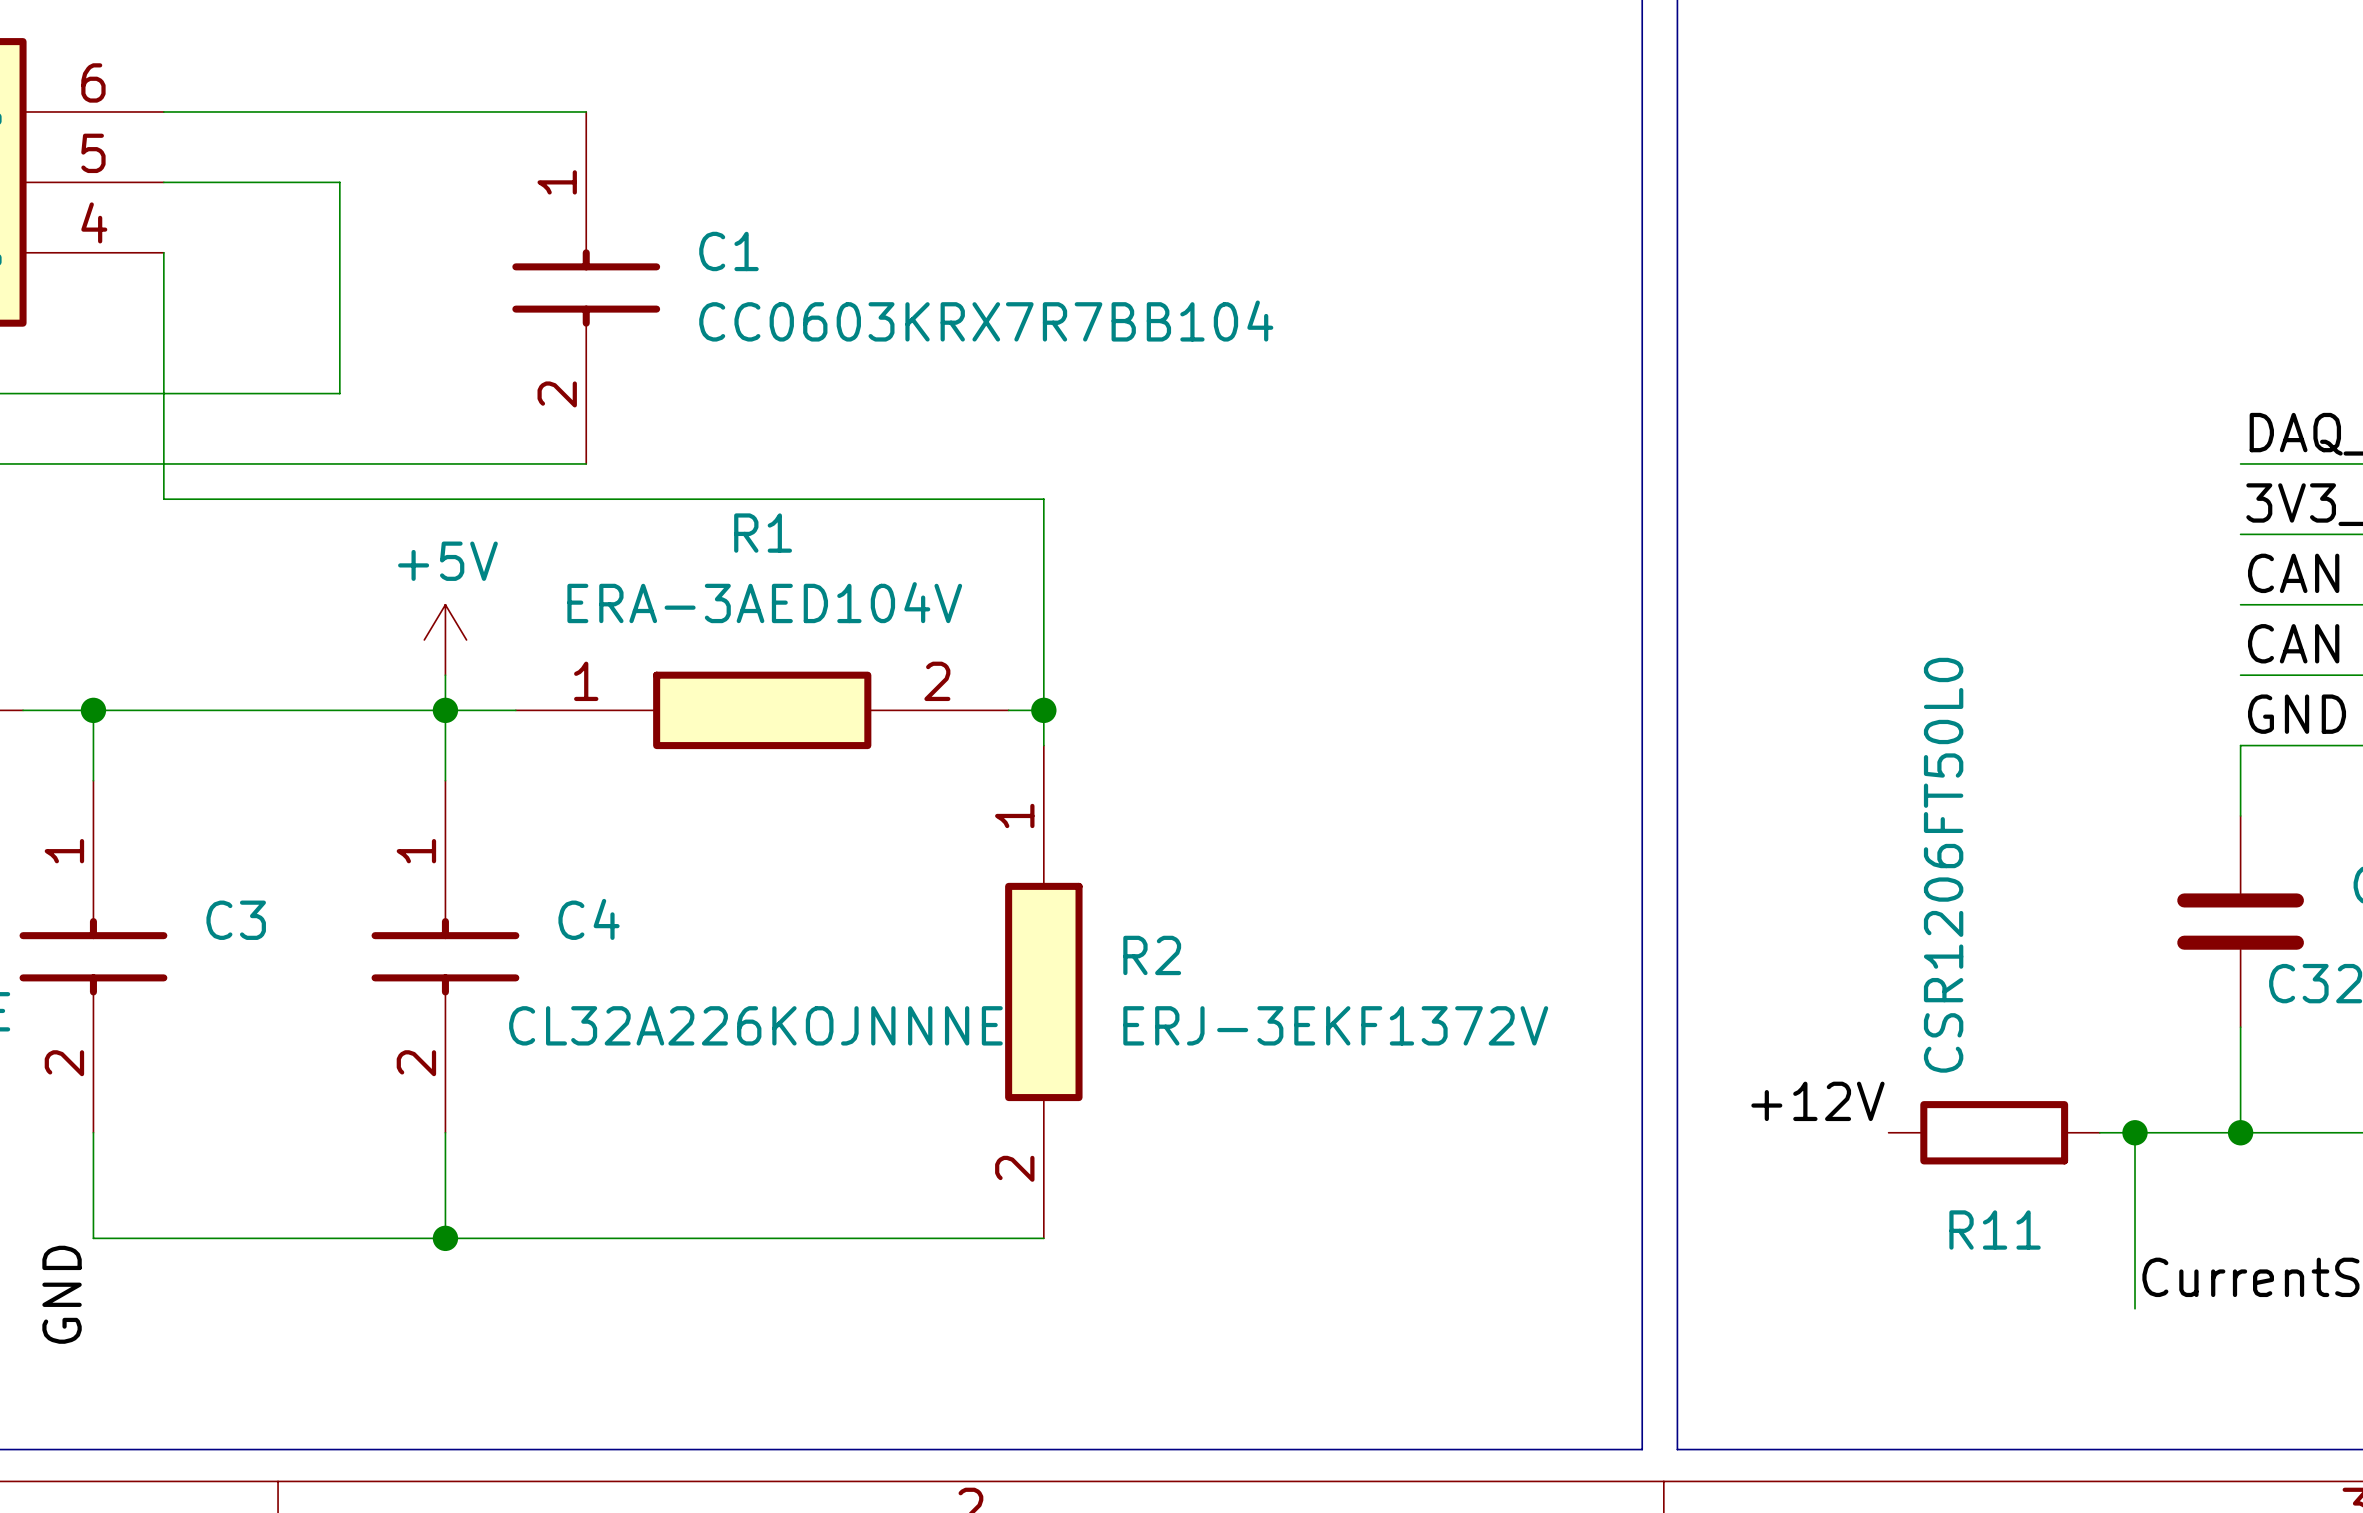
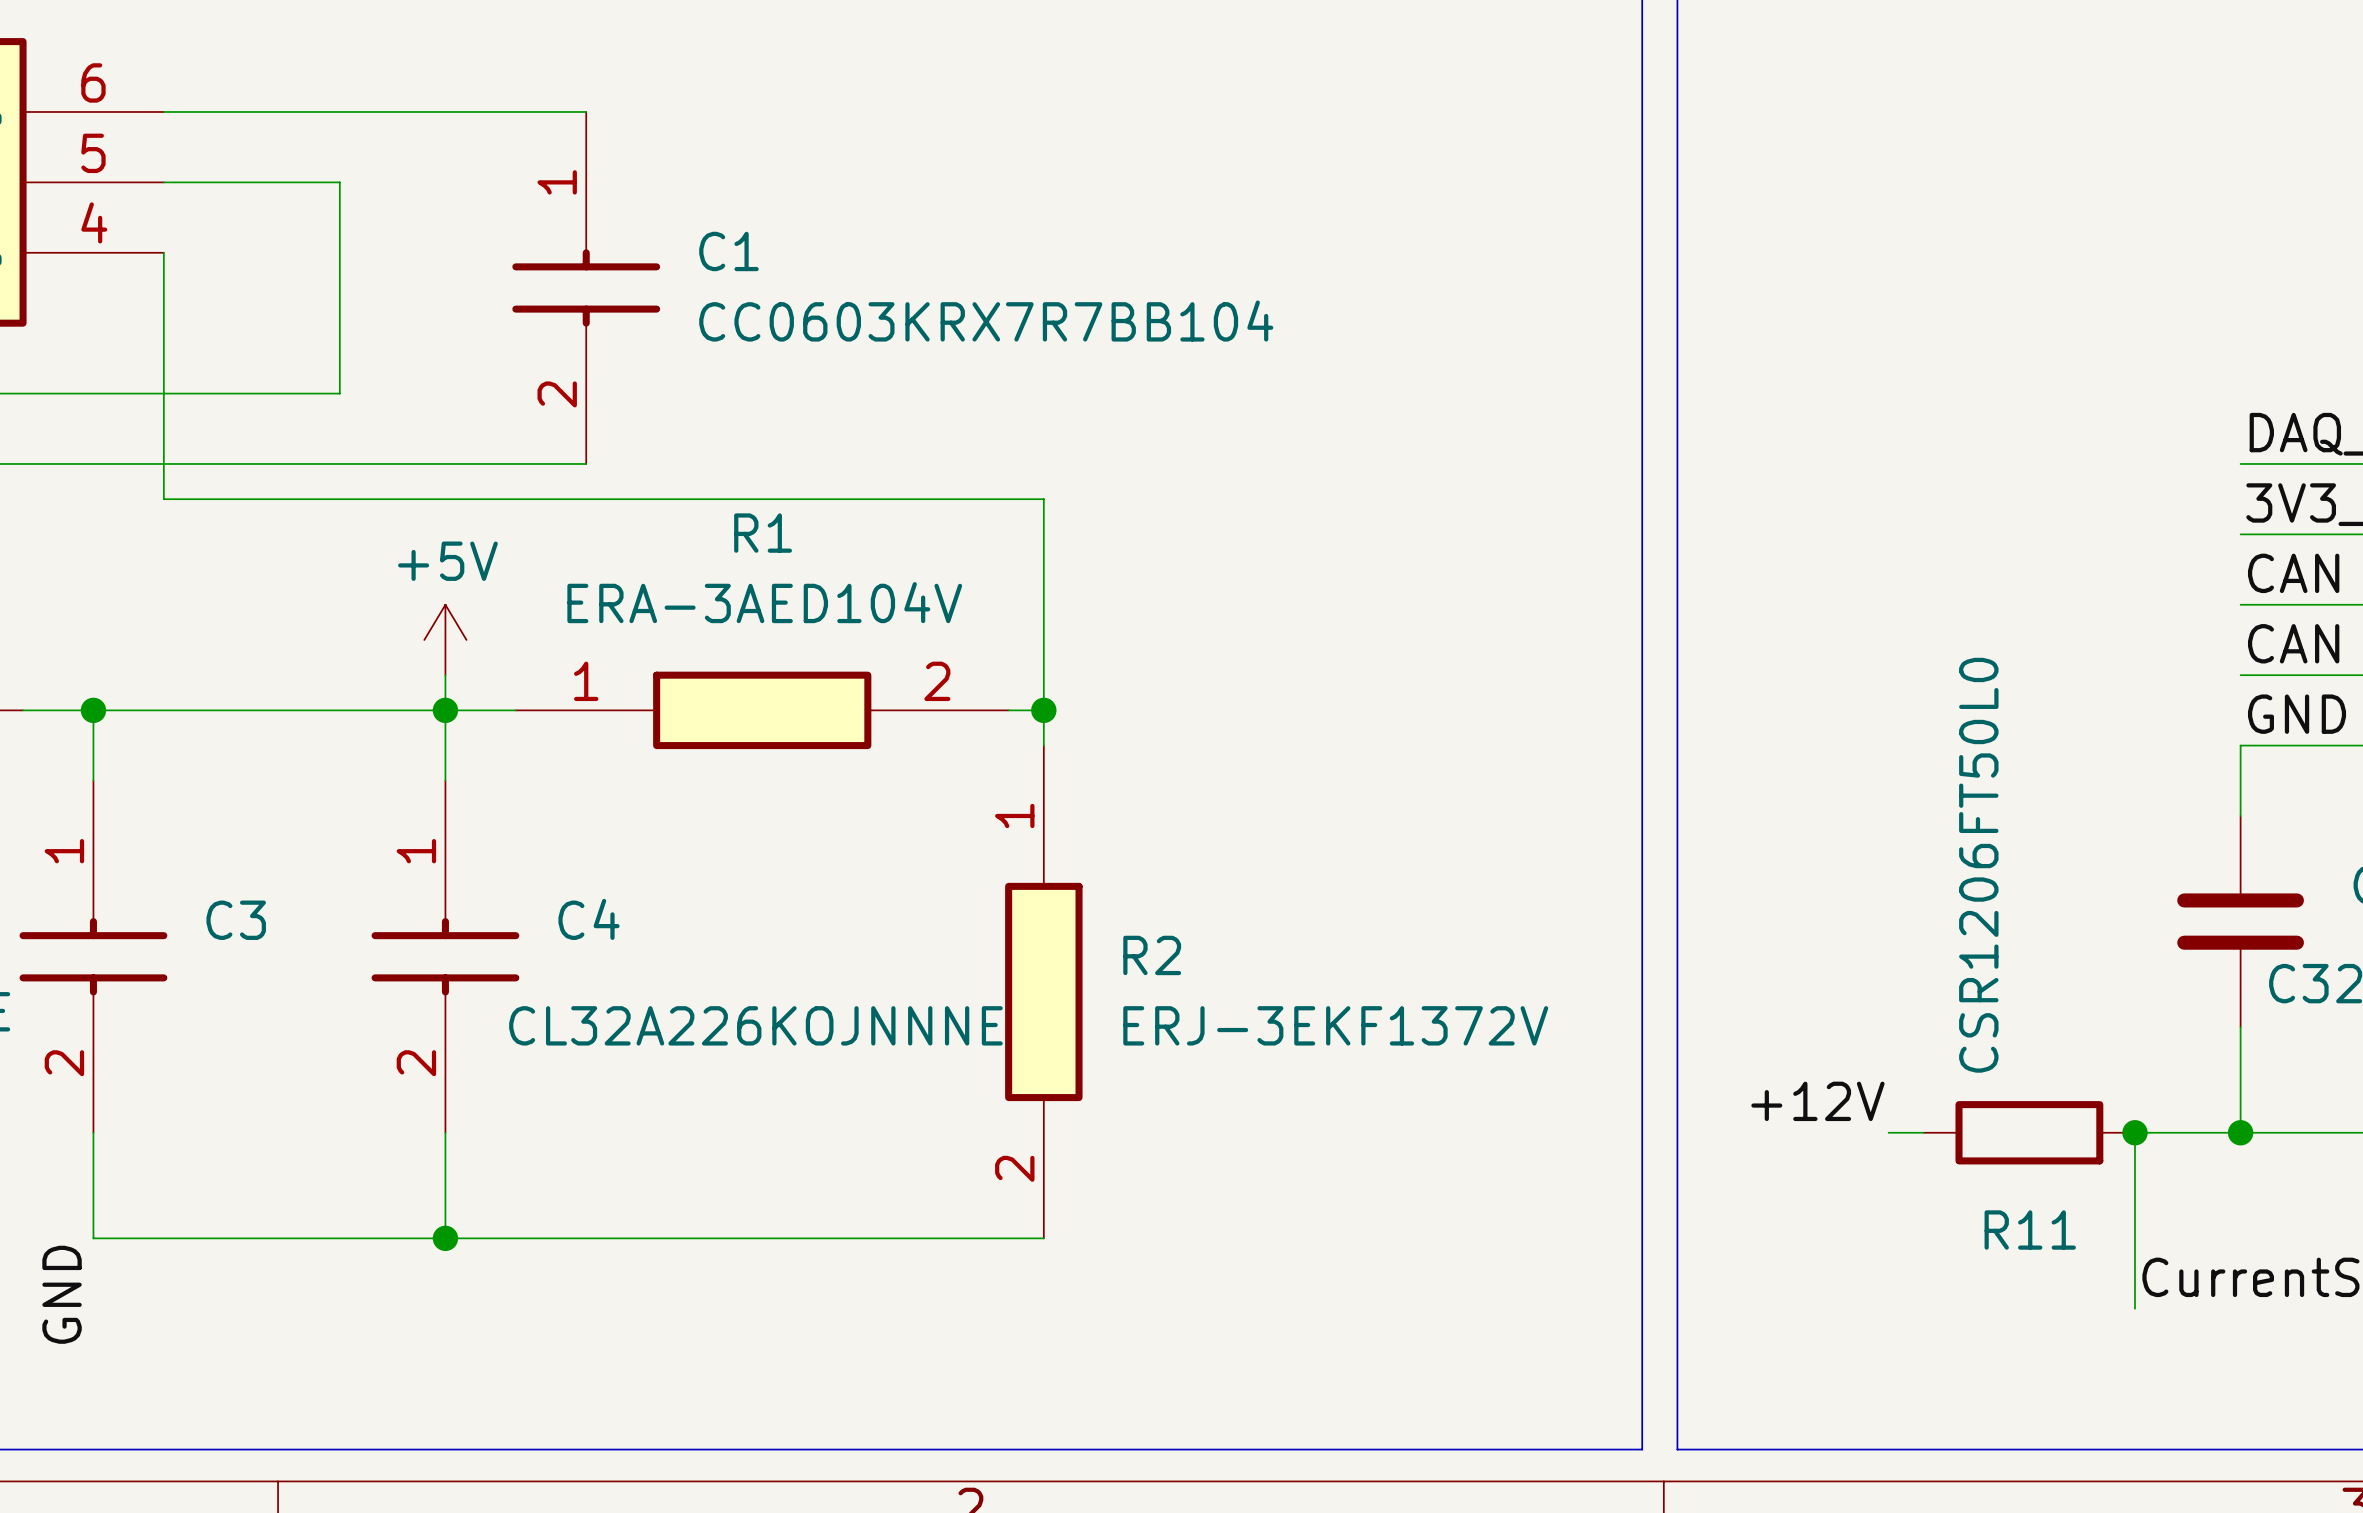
R11 position: (1994, 1132) -> (2029, 1132)

